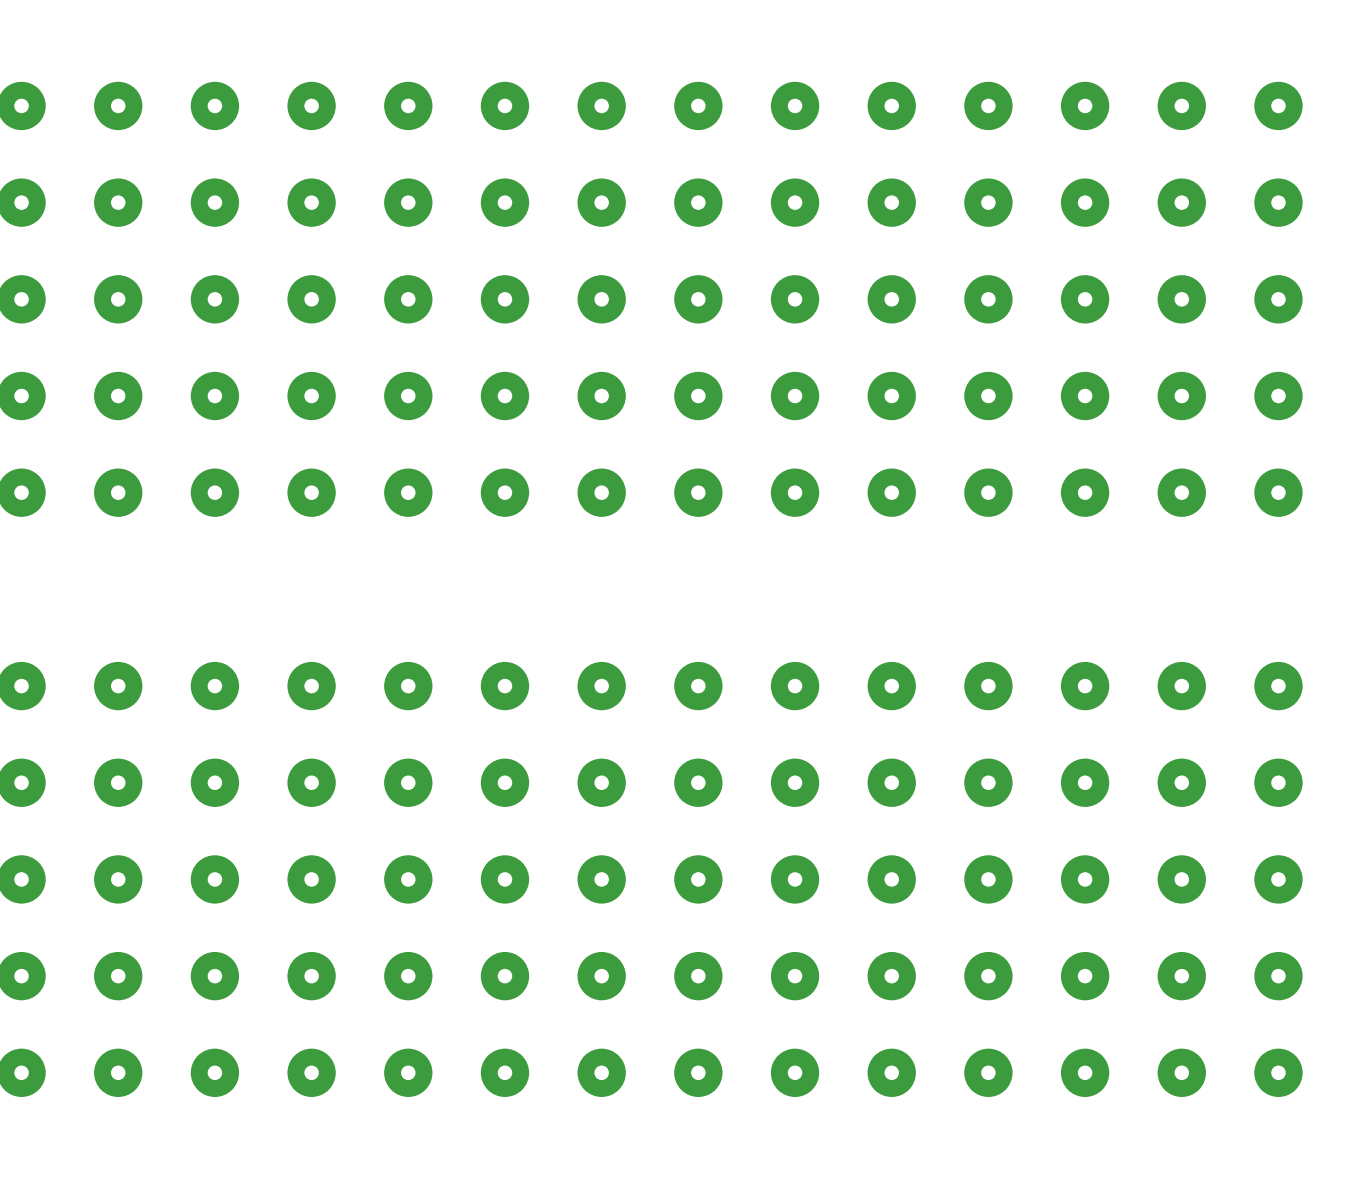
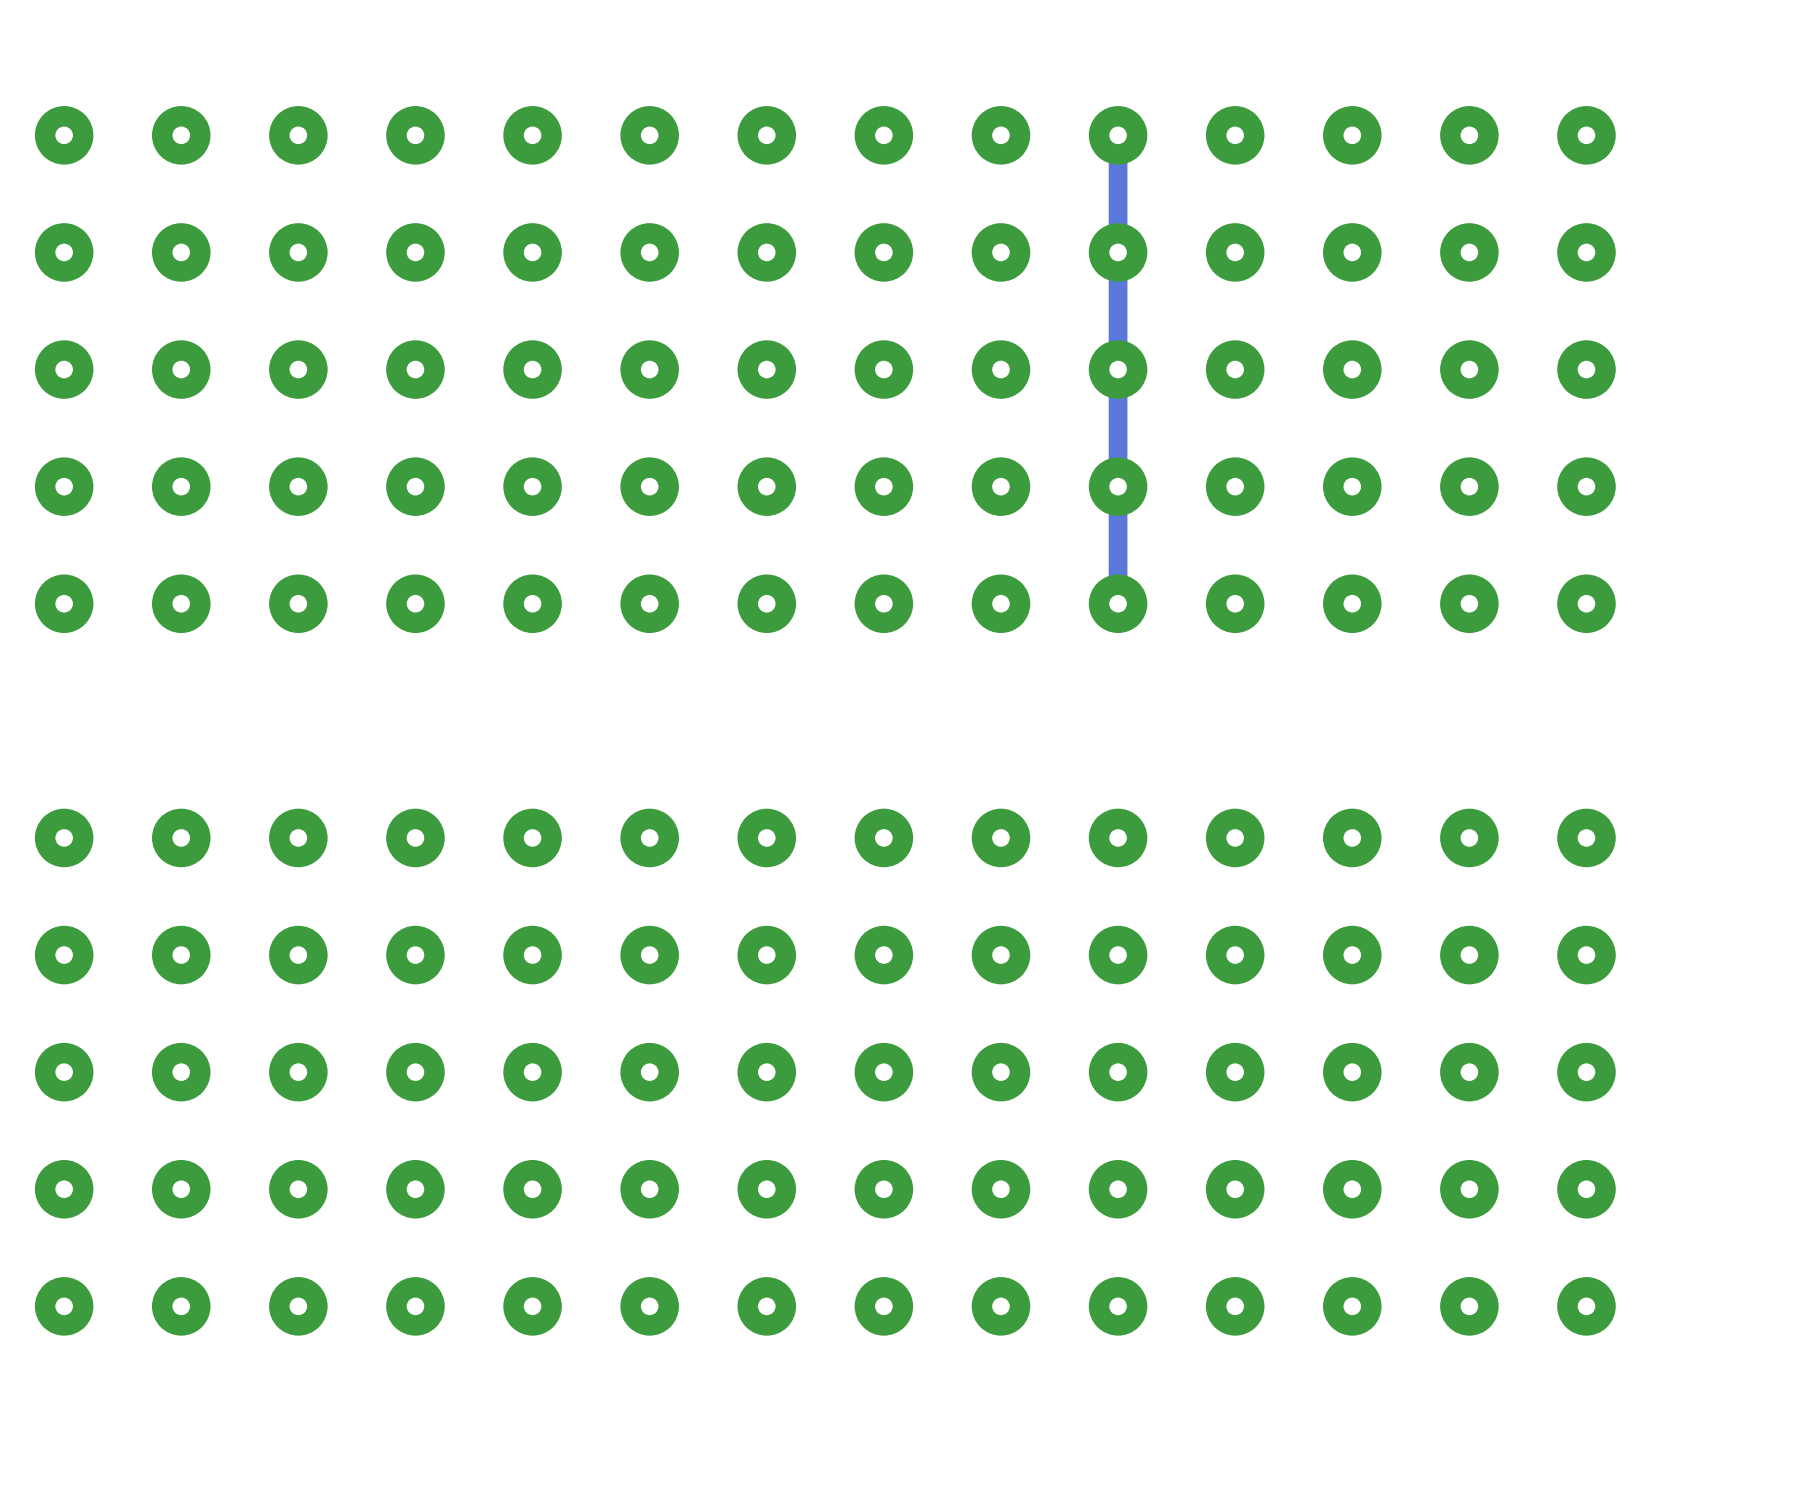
bottom track: none -> (1118, 135) (1118, 603)

